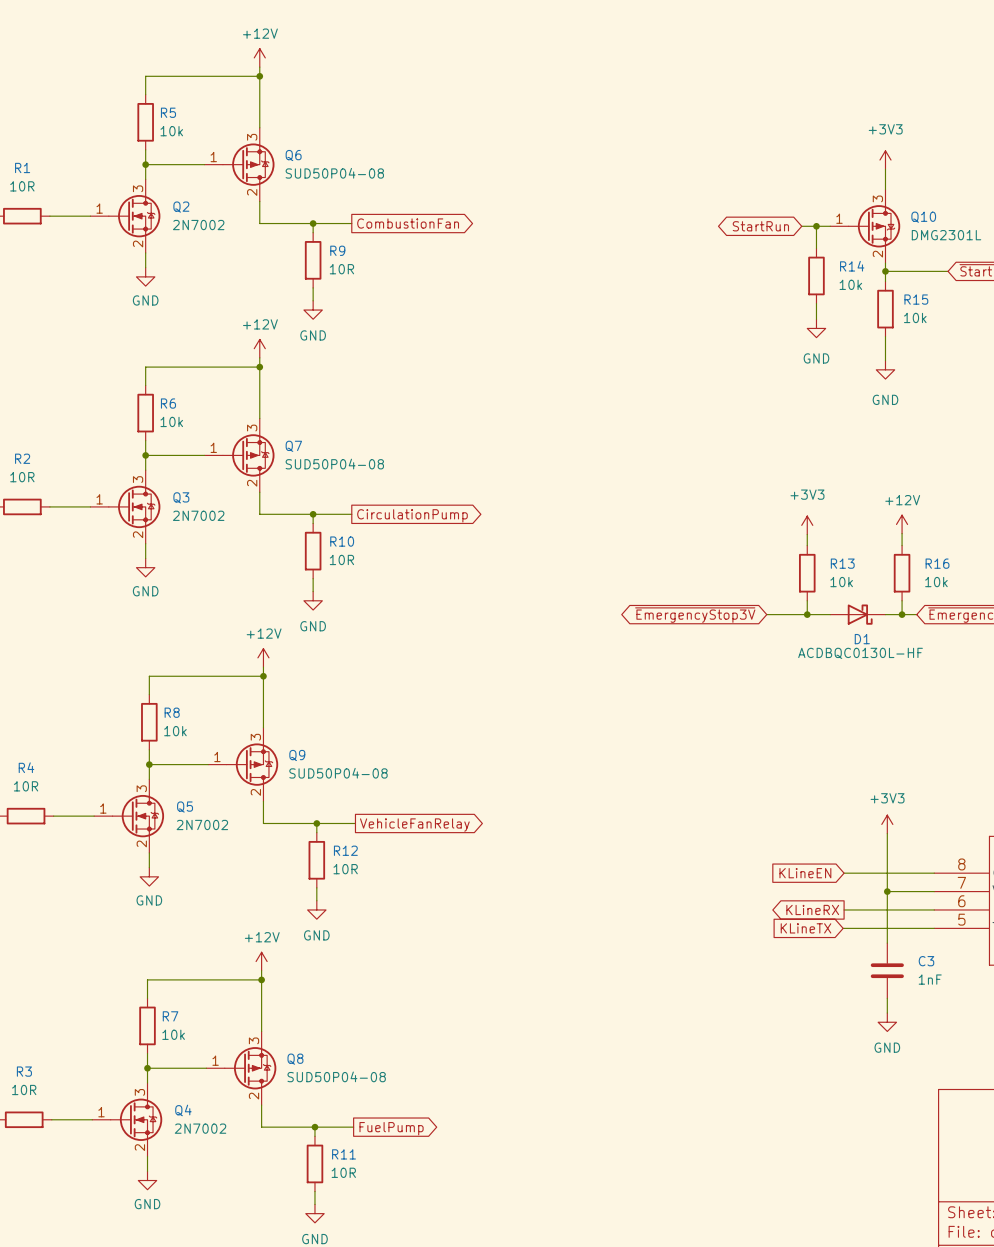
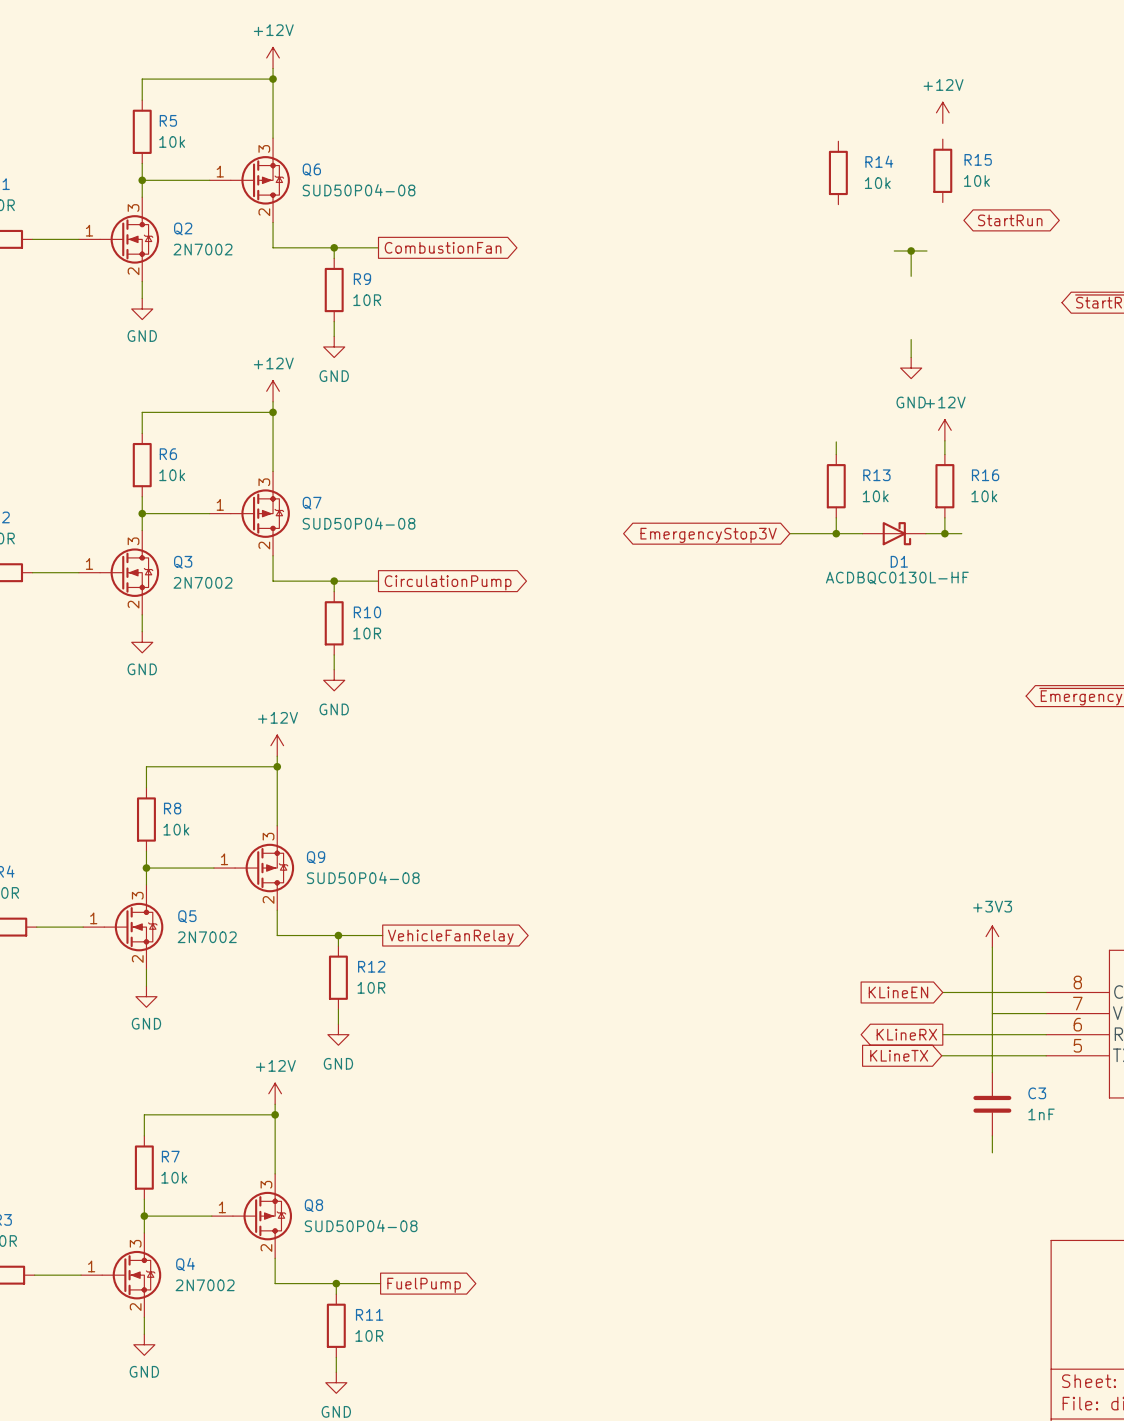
power symbol: none -> +12V (942, 112)
power symbol: +3V3 (885, 160) -> none
wire: (885, 169) (885, 189) -> none
global label rotation: 0° (760, 226) -> 180° (1010, 220)
global label position: StartRun (760, 226) -> StartRun (1010, 220)
Q10: DMG2301L (865, 226) -> none
wire: (885, 263) (885, 281) -> none
wire: (885, 271) (948, 271) -> none
junction: (885, 271) -> none
R14 position: (816, 275) -> (838, 172)
R15 position: (885, 309) -> (942, 170)
wire: (885, 336) (885, 360) -> none
power symbol: GND (885, 369) -> none
junction: none -> (836, 533)
junction: none -> (944, 533)
global label: none -> EmergencyStop3V (708, 535)
power symbol position: +12V (902, 524) -> +12V (944, 430)
power symbol: +3V3 (807, 525) -> none
wire: (902, 533) (902, 545) -> (944, 440) (944, 454)
wire: (807, 534) (807, 545) -> (836, 441) (836, 454)
R13 position: (807, 573) -> (836, 486)
R16 position: (902, 573) -> (944, 486)
wire: (807, 600) (807, 614) -> (836, 517) (836, 533)
wire: (902, 600) (902, 614) -> (944, 517) (944, 533)
wire: (766, 614) (830, 614) -> (789, 533) (862, 533)
junction: (807, 614) -> none
D1 position: (857, 614) -> (894, 533)
wire: (885, 614) (916, 614) -> (925, 533) (961, 533)
junction: (902, 614) -> none
global label: ~{EmergencyStop3V} (695, 615) -> none
junction: (887, 891) -> none
power symbol: GND (887, 1022) -> none

